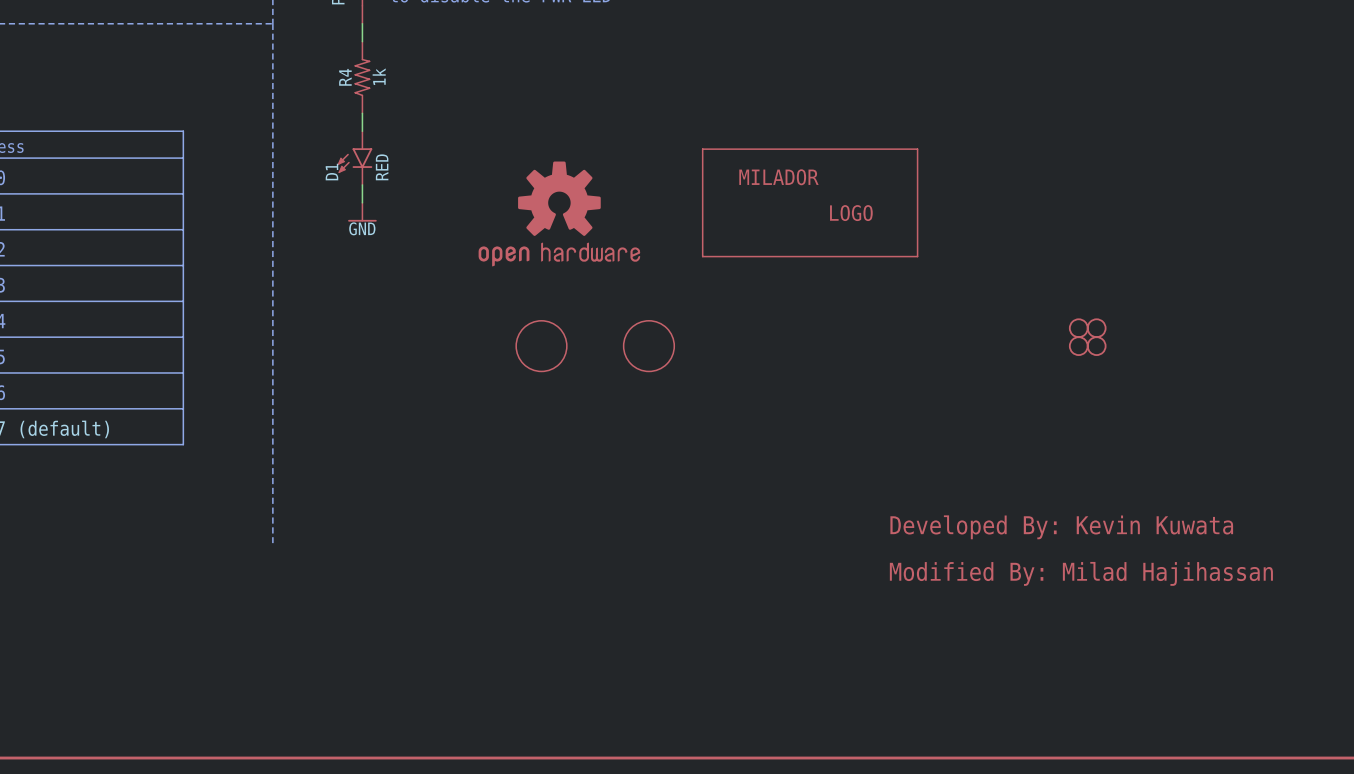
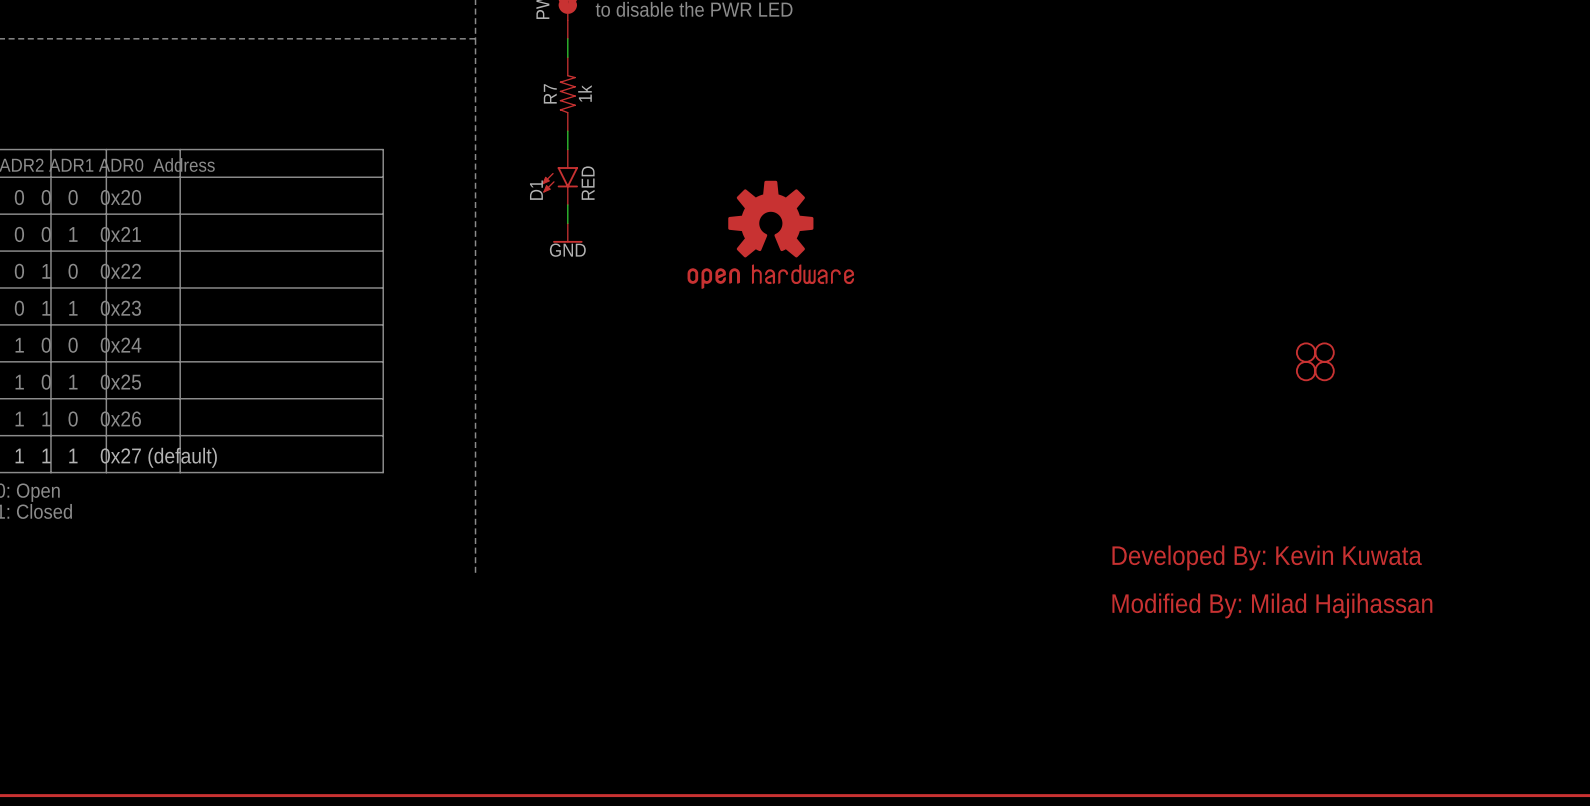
R4 name: R4 (345, 77) -> R7 (550, 93)
part: (810, 202) -> none
part: (541, 346) -> none
part: (648, 346) -> none

